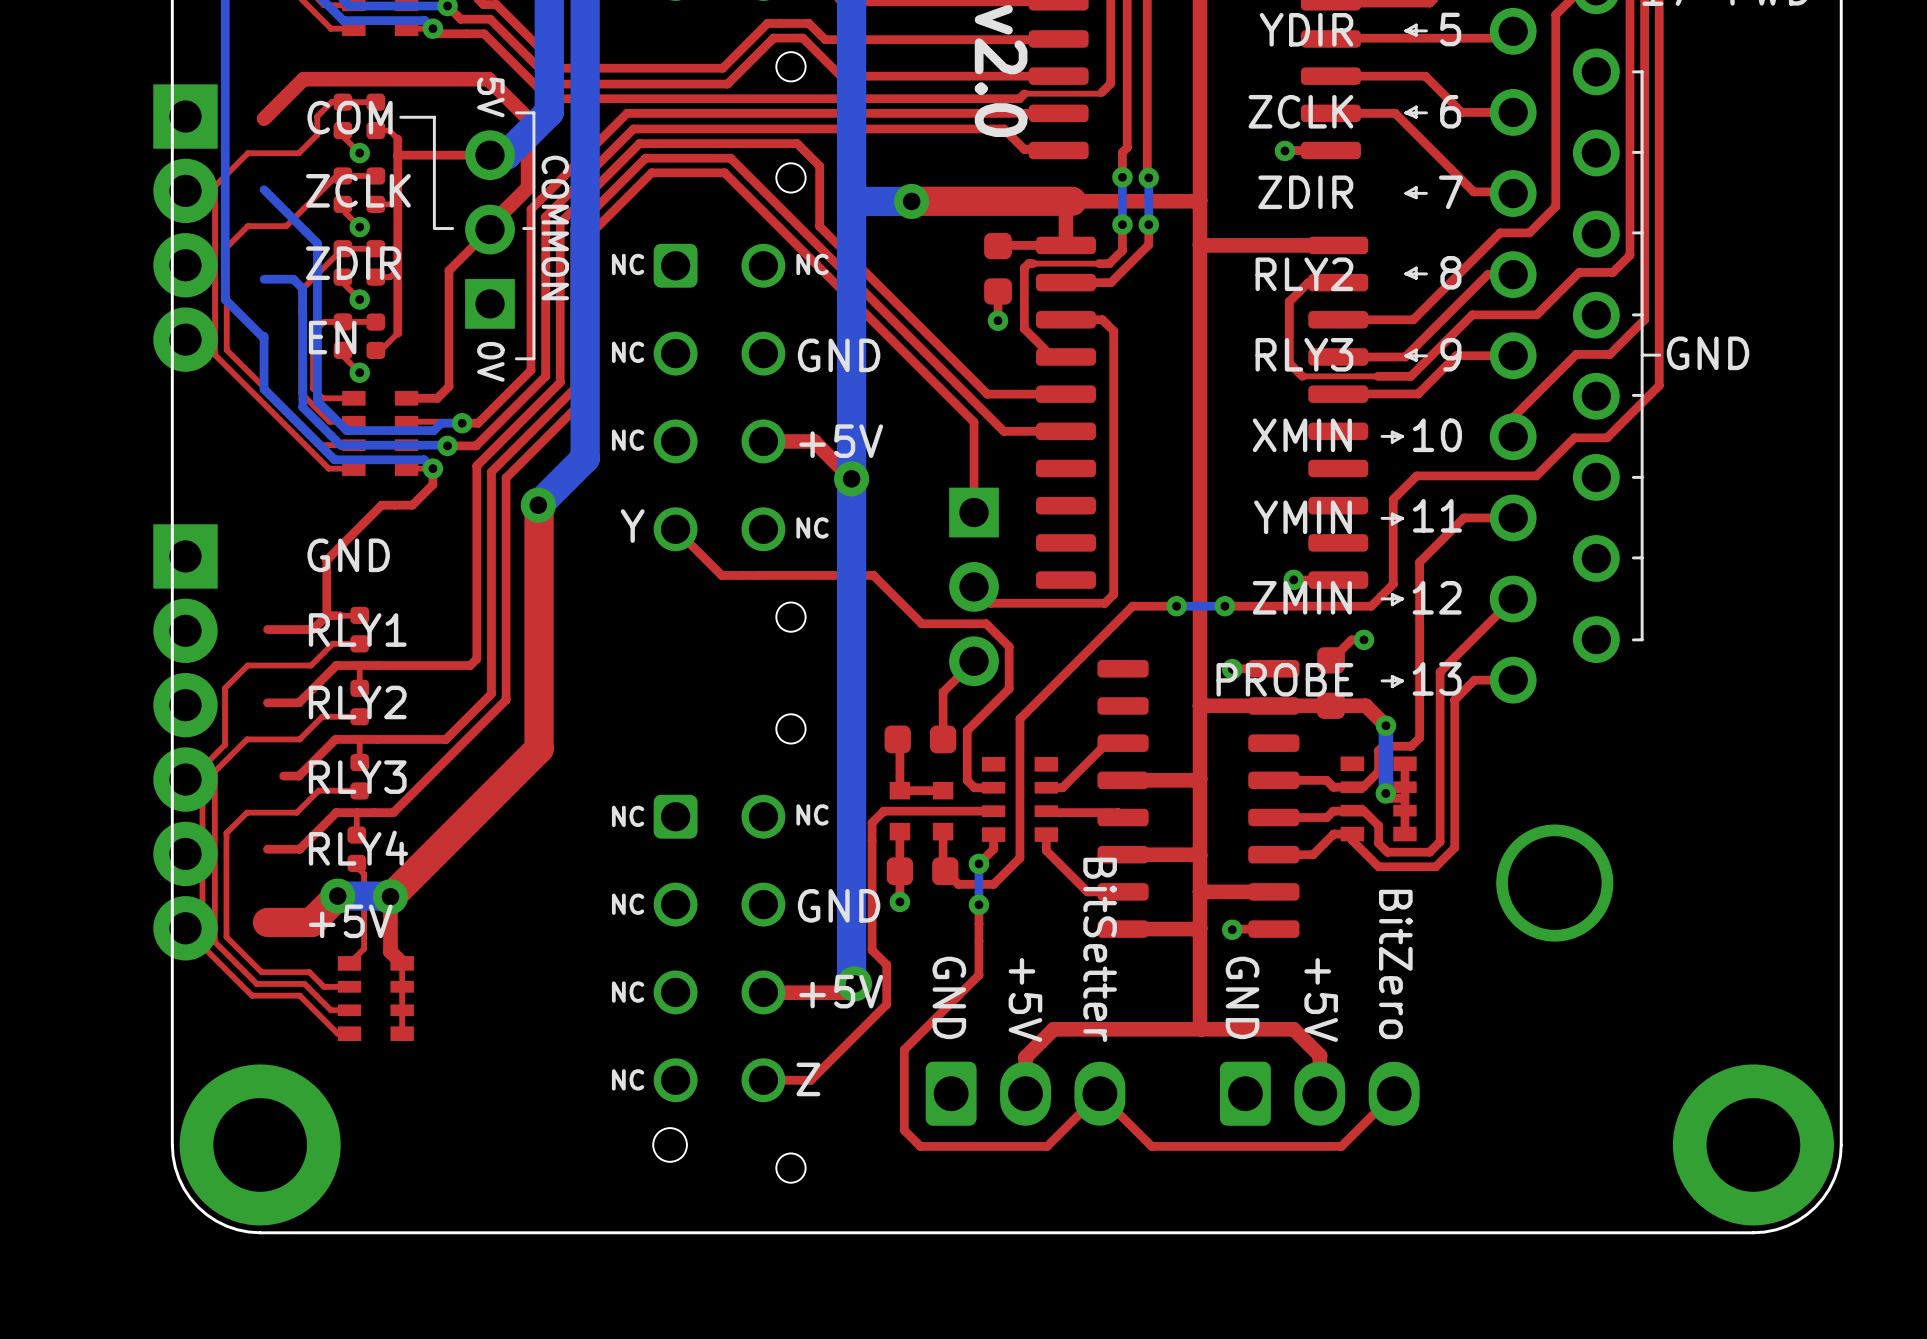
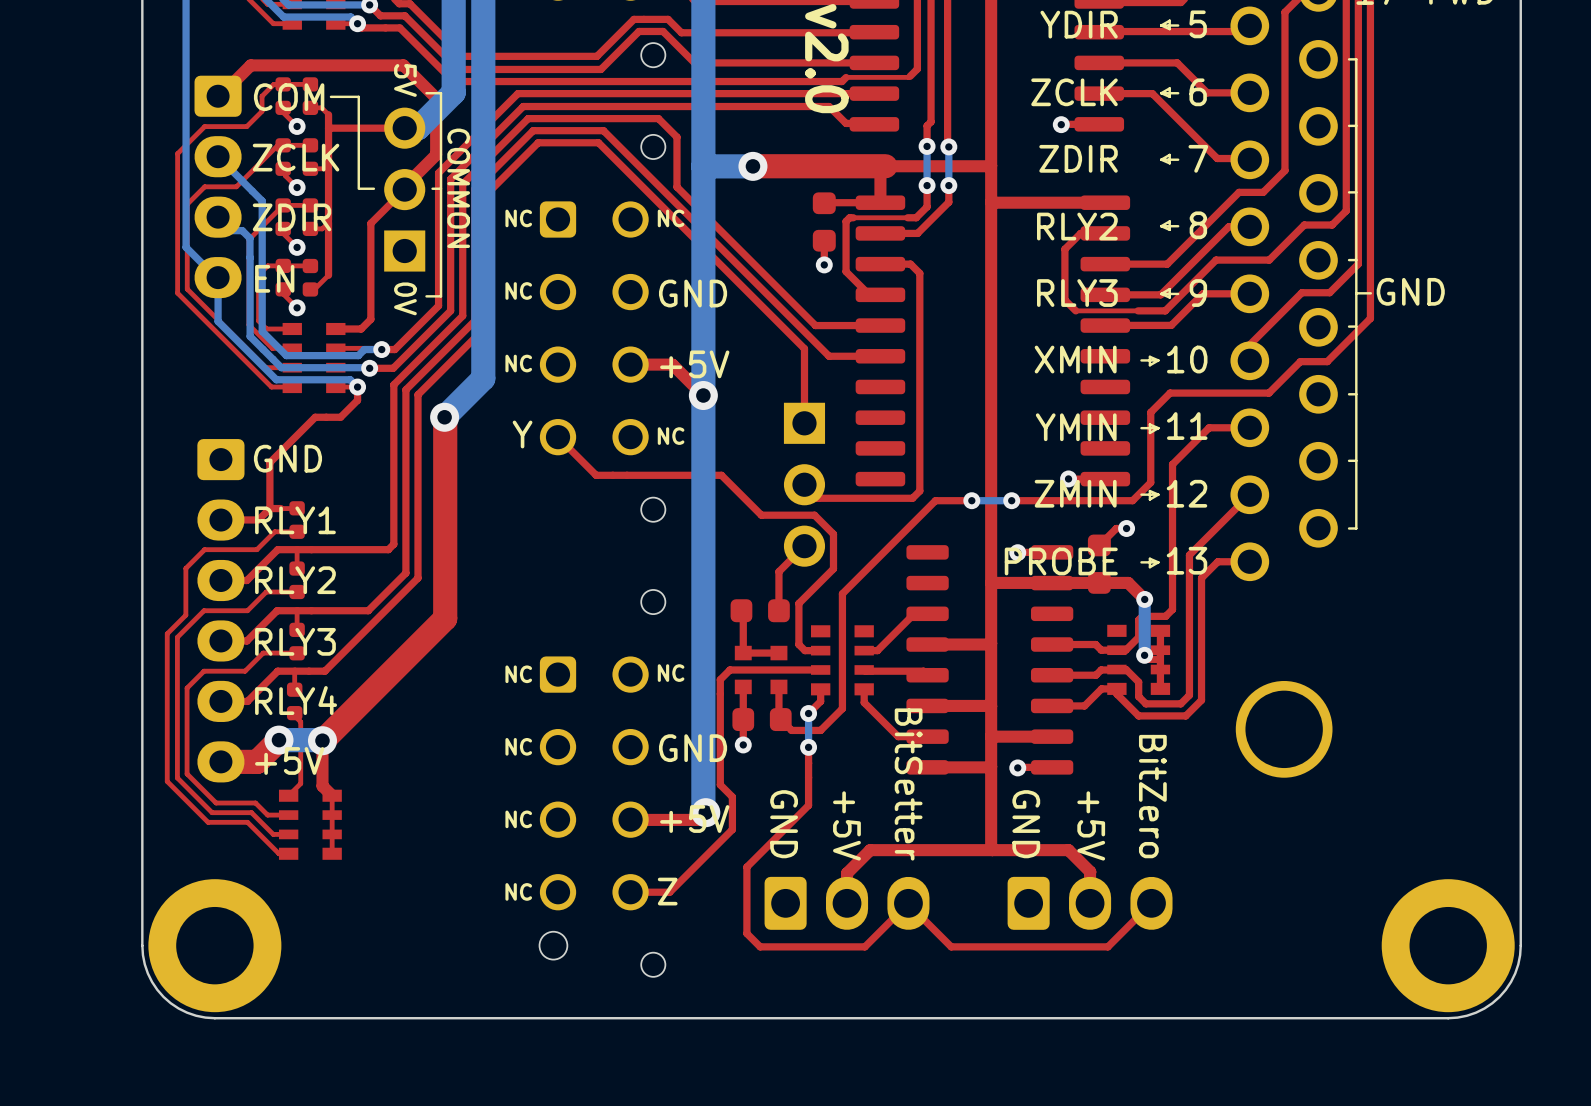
part: none -> (218, 186)
part: (185, 228) -> none
part: none -> (220, 610)
part: (185, 742) -> none

